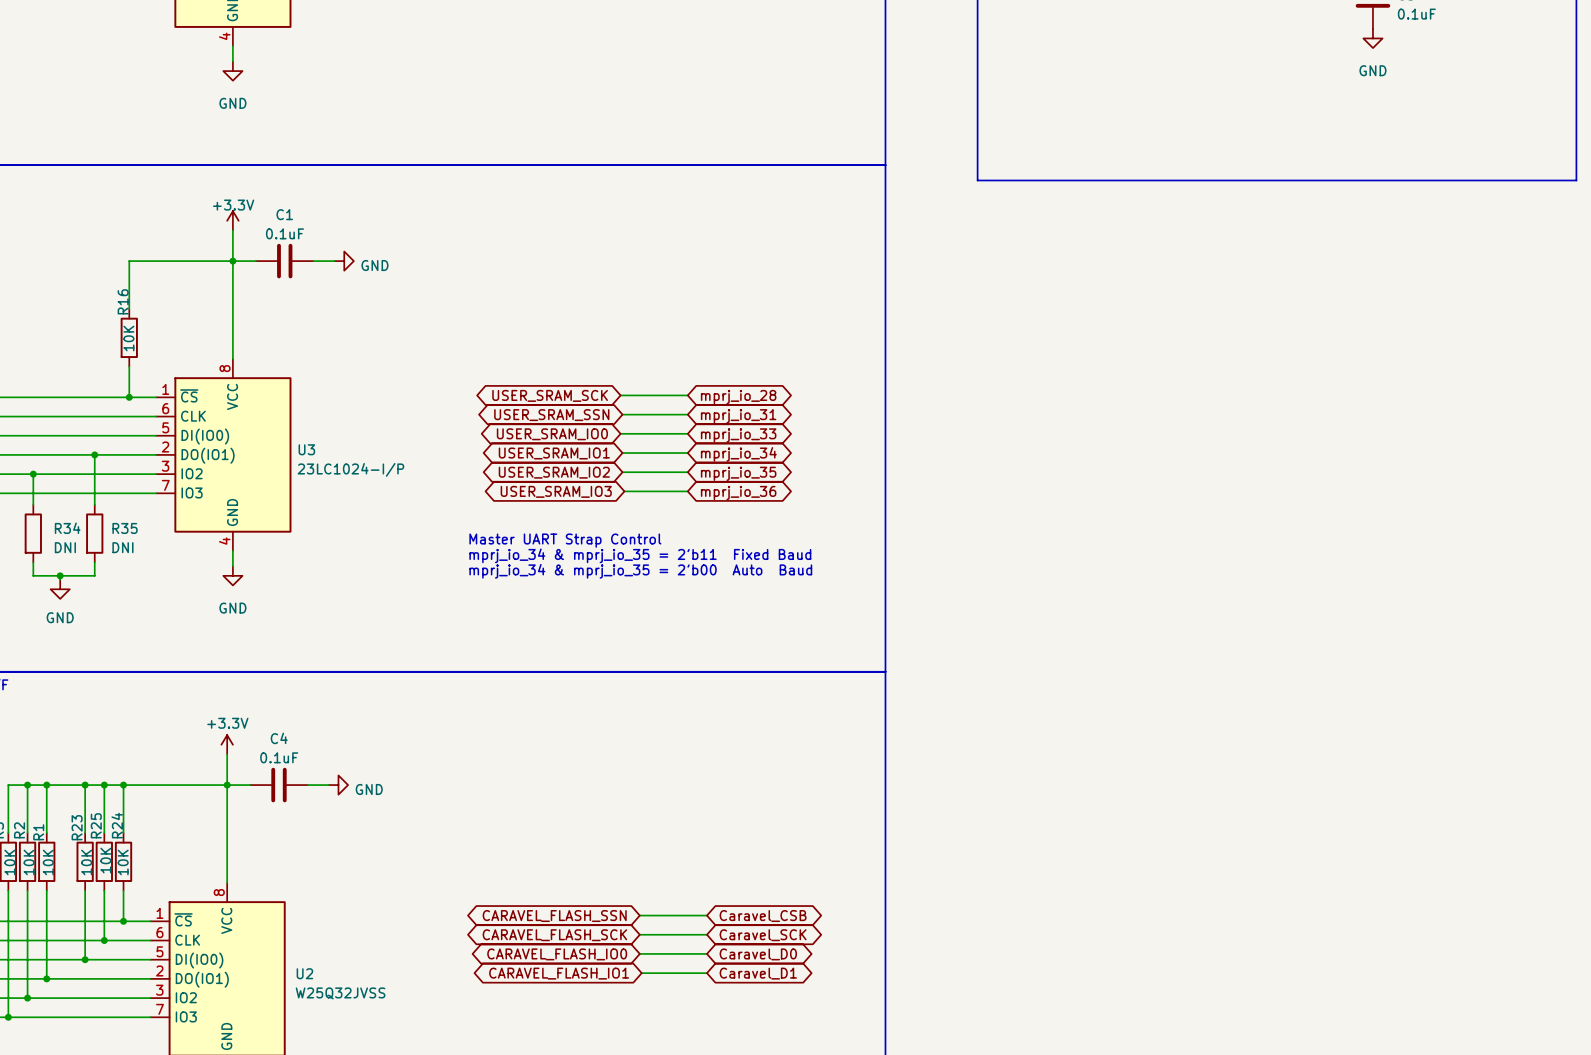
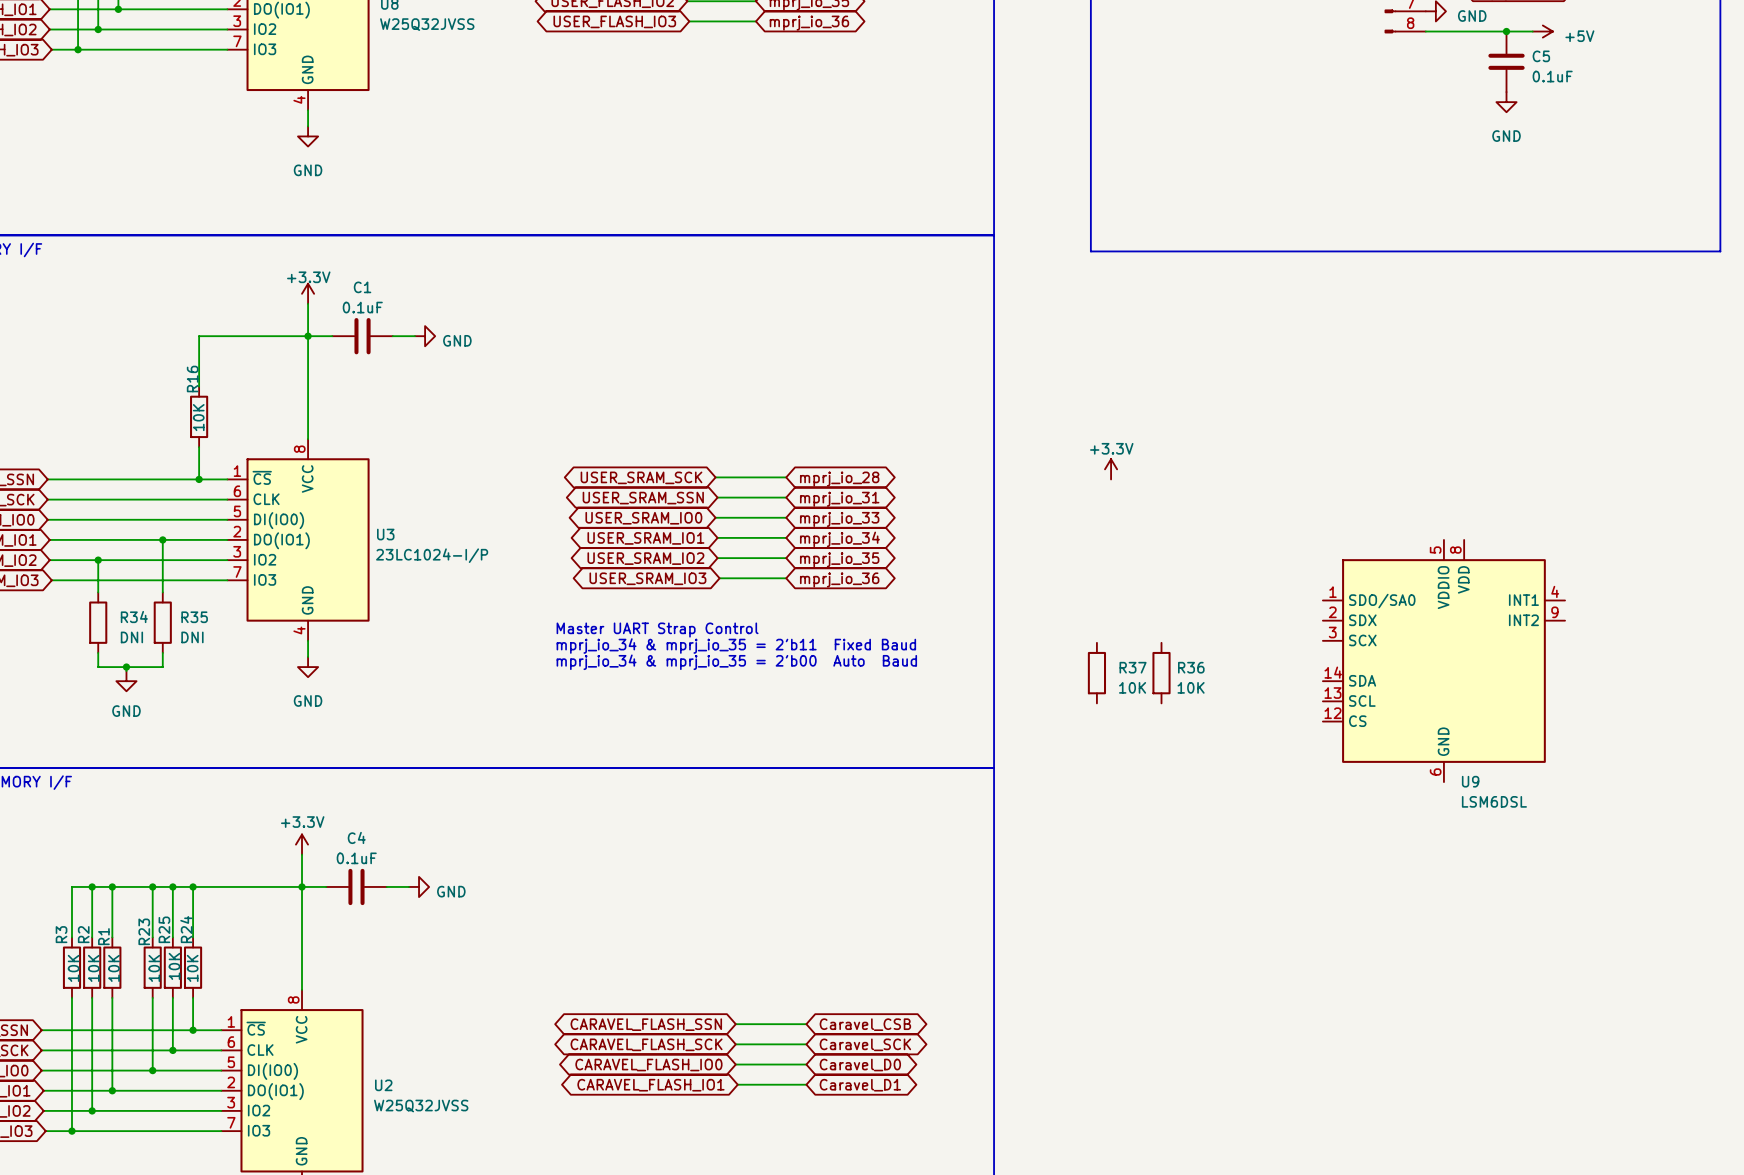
power symbol: none -> +3.3V (1111, 469)
U9: none -> LSM6DSL (1443, 661)
R37: none -> 10K (1096, 673)
R36: none -> 10K (1161, 673)

